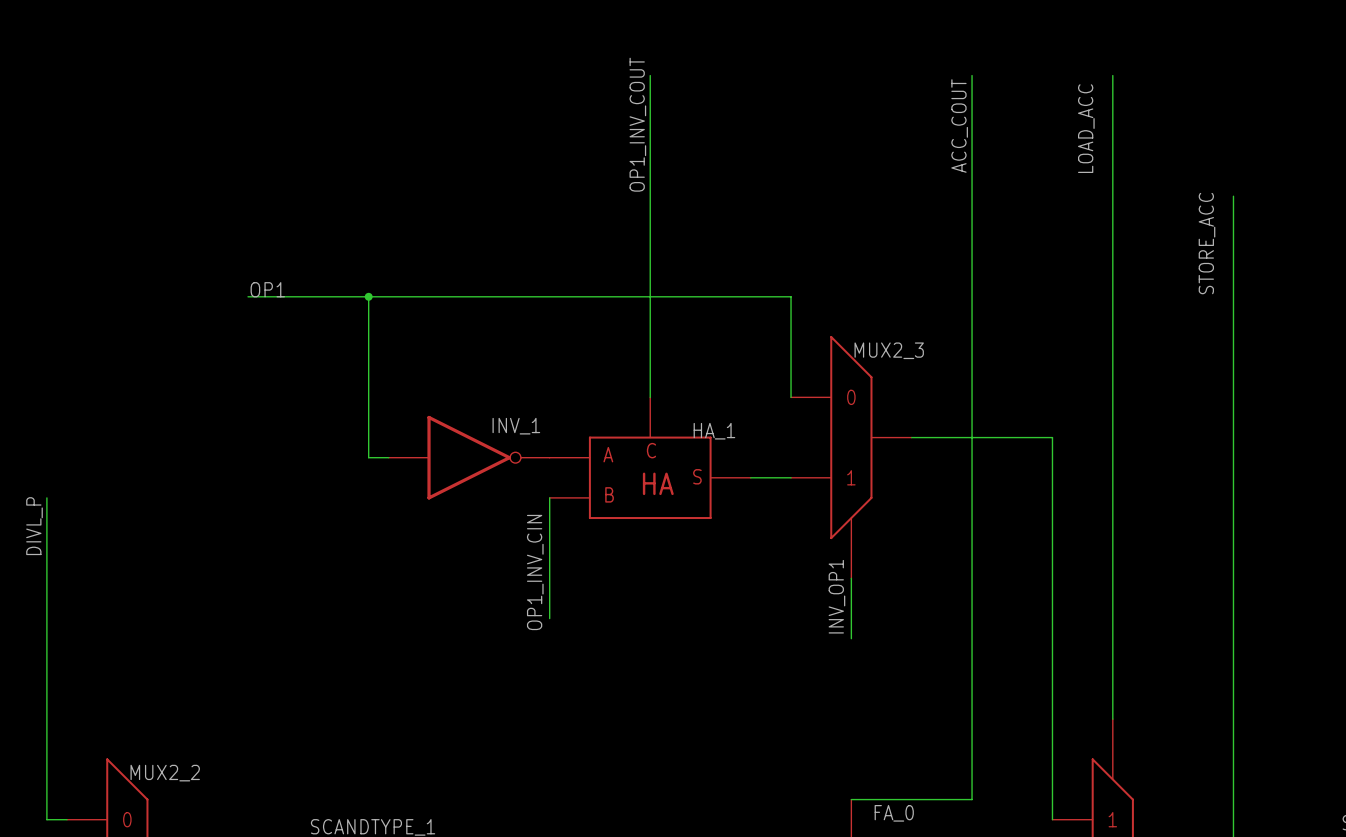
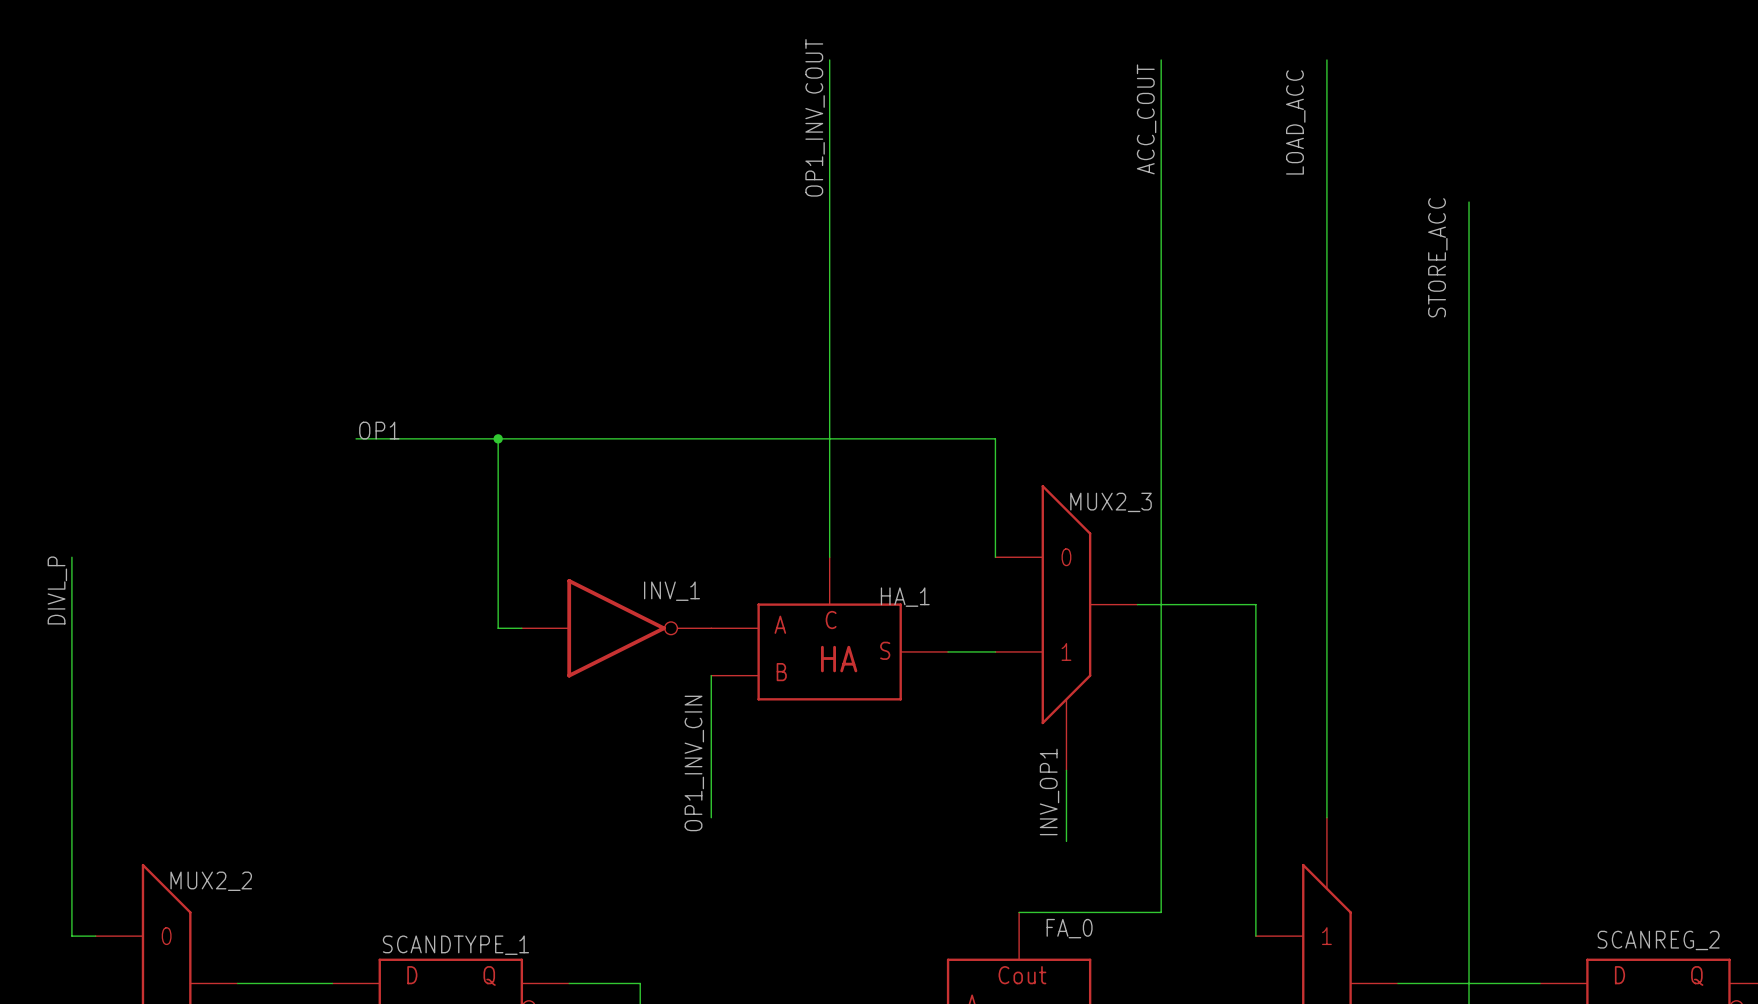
wire: (650, 75) (650, 397) -> none
wire: none -> (829, 59) (829, 557)
label position: OP1_INV_COUT (637, 124) -> OP1_INV_COUT (815, 117)
label position: OP1 (267, 289) -> OP1 (379, 430)
wire: (248, 296) (791, 296) (791, 397) -> (356, 438) (995, 438) (995, 557)
wire: (368, 296) (368, 457) (388, 457) -> (498, 438) (498, 628) (521, 628)
junction: (368, 296) -> none
junction: none -> (498, 438)
wire: (911, 437) (1052, 437) (1052, 538) -> (1137, 604) (1255, 604)
INV_1 position: (469, 457) -> (616, 628)
MUX2_3 position: (851, 457) -> (1066, 627)
HA_1 position: (650, 458) -> (829, 628)
wire: (750, 477) (791, 477) -> (948, 651) (995, 651)
wire: (549, 497) (549, 618) -> (711, 675) (711, 817)
label position: OP1_INV_CIN (535, 572) -> OP1_INV_CIN (694, 763)
wire: (851, 578) (851, 638) -> (1066, 770) (1066, 841)
label position: INV_OP1 (836, 596) -> INV_OP1 (1049, 791)

